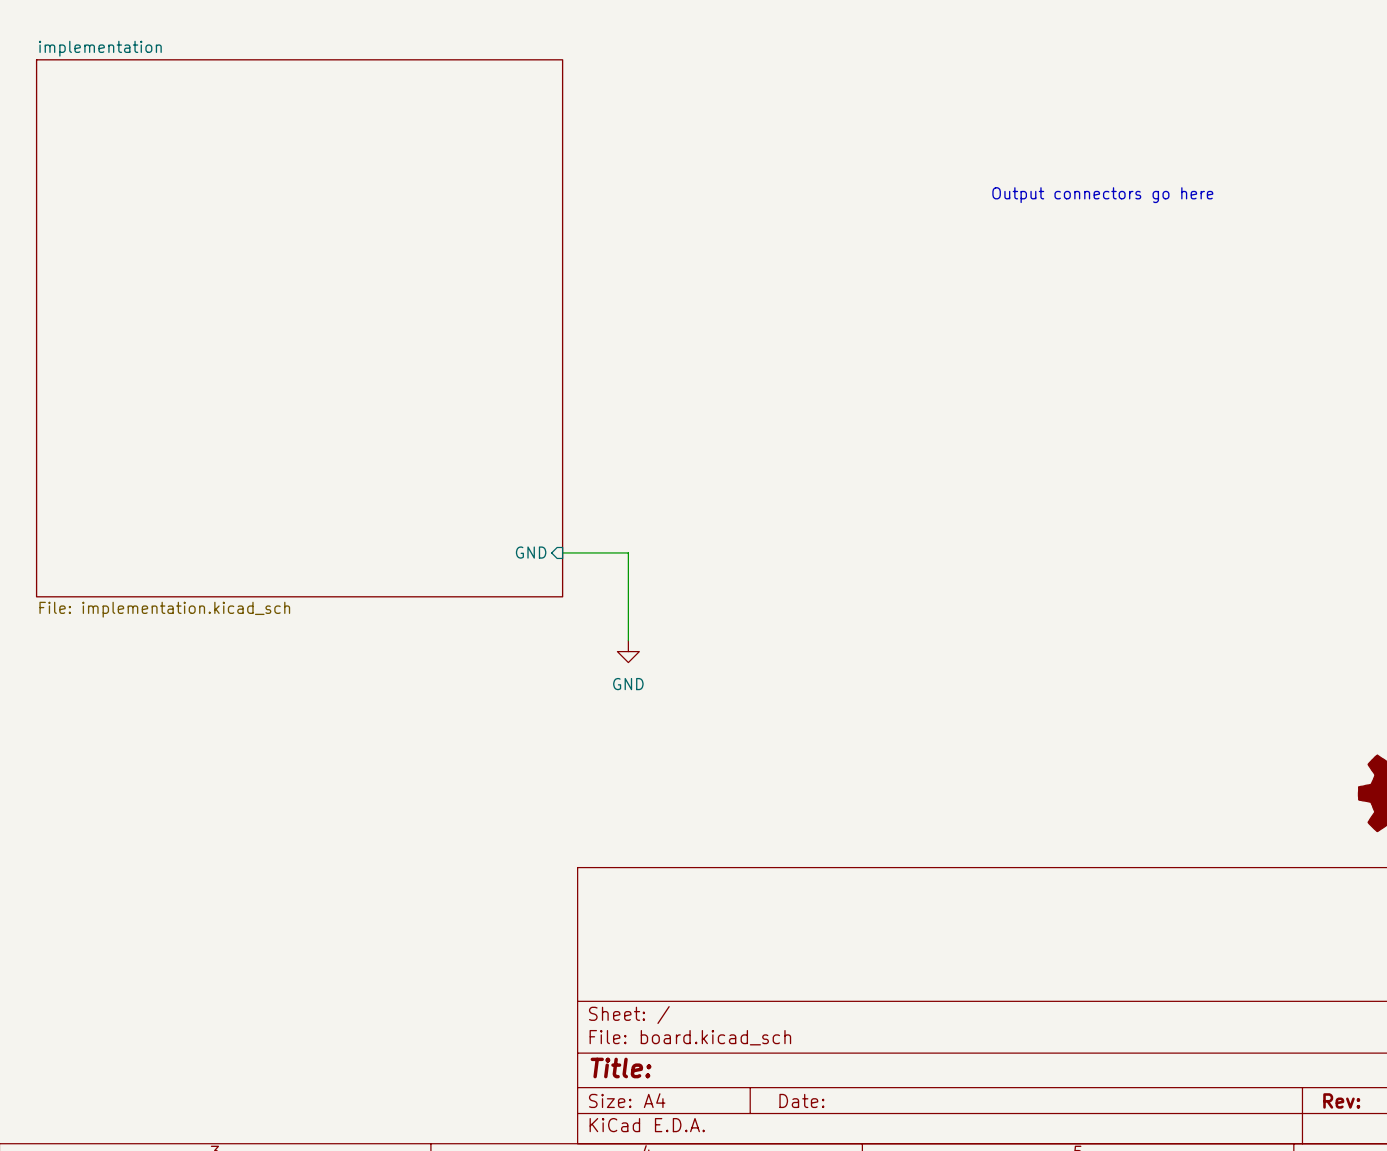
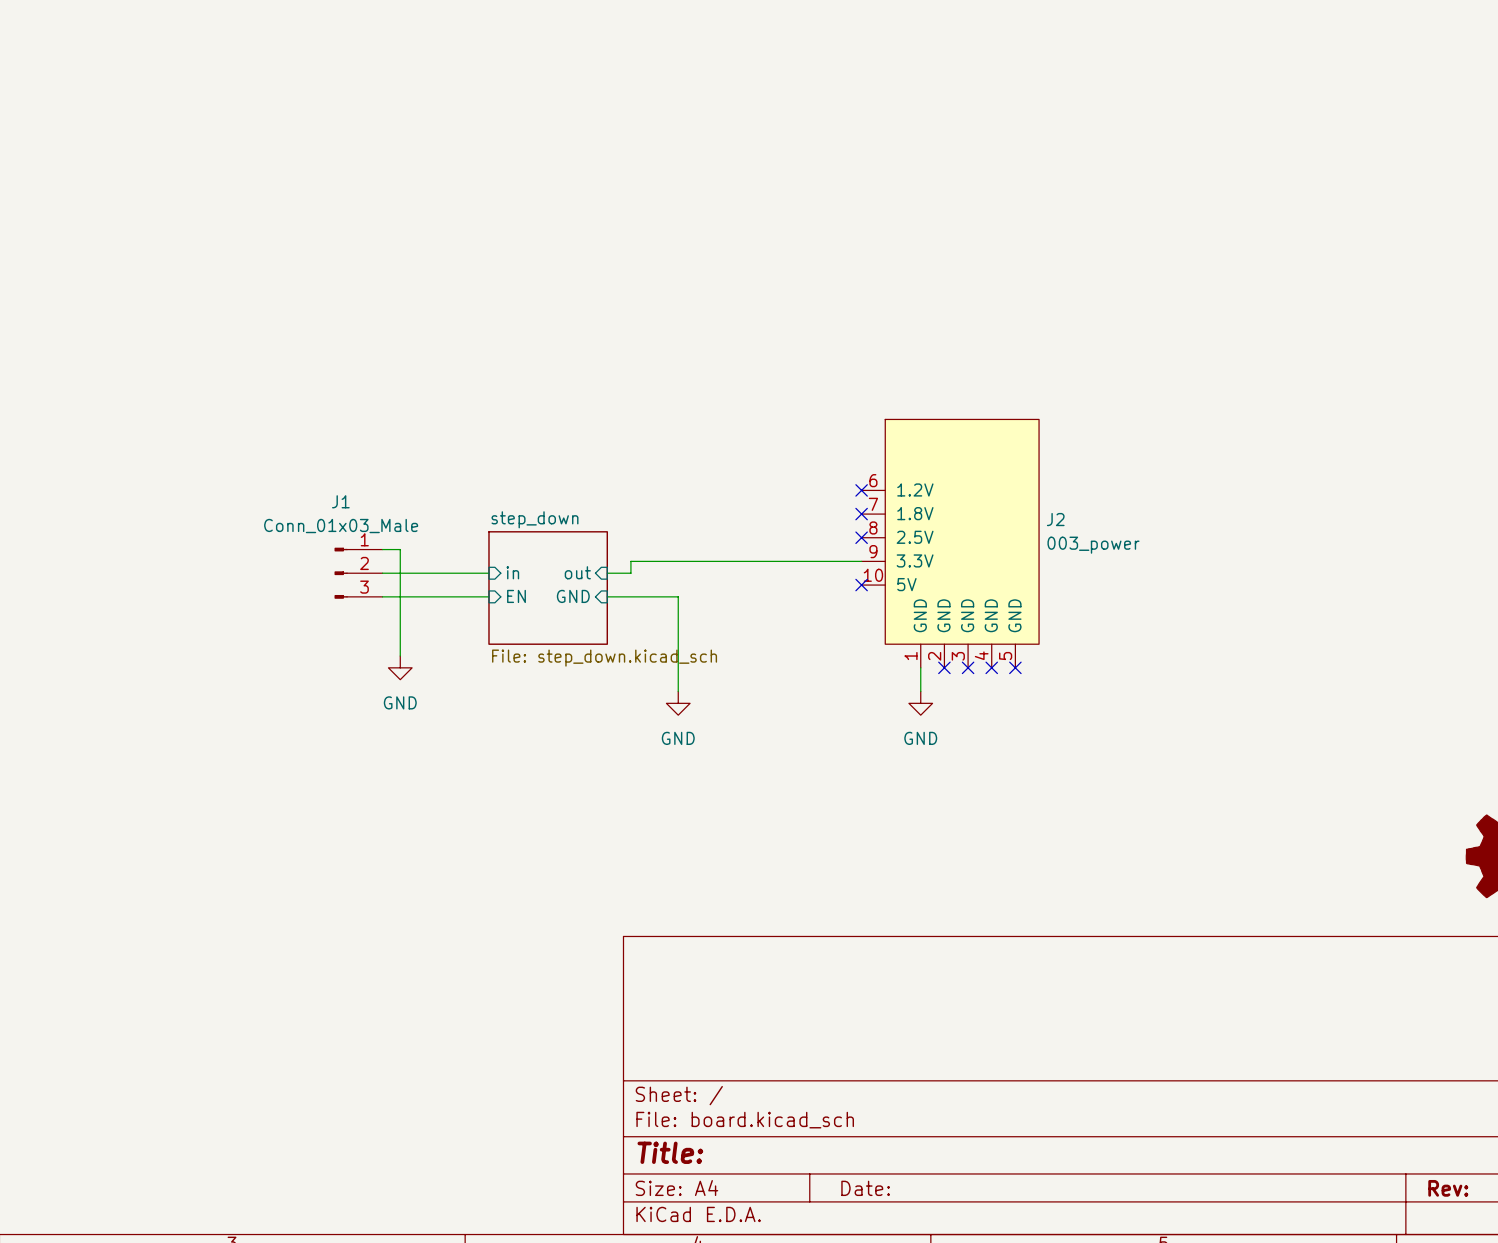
text: Output connectors go here (1102, 195) -> none
sheet implementation: File: implementation.kicad_sch (299, 328) -> none
no-connect mark: none -> (861, 490)
no-connect mark: none -> (861, 514)
no-connect mark: none -> (861, 537)
J2: none -> 003_power (950, 543)
wire: none -> (382, 549) (400, 549) (400, 656)
wire: none -> (861, 561) (630, 561) (630, 573) (607, 573)
sheet pin: none -> in (512, 572)
sheet pin: none -> out (577, 572)
J1: none -> Conn_01x03_Male (358, 573)
wire: none -> (382, 573) (488, 573)
no-connect mark: none -> (861, 585)
sheet step_down: none -> File: step_down.kicad_sch (548, 588)
wire: none -> (382, 596) (488, 596)
sheet pin: none -> EN (516, 596)
power symbol: none -> GND (400, 667)
wire: none -> (920, 667) (920, 691)
no-connect mark: none -> (944, 667)
no-connect mark: none -> (968, 667)
no-connect mark: none -> (991, 667)
no-connect mark: none -> (1015, 667)
power symbol: none -> GND (920, 703)

